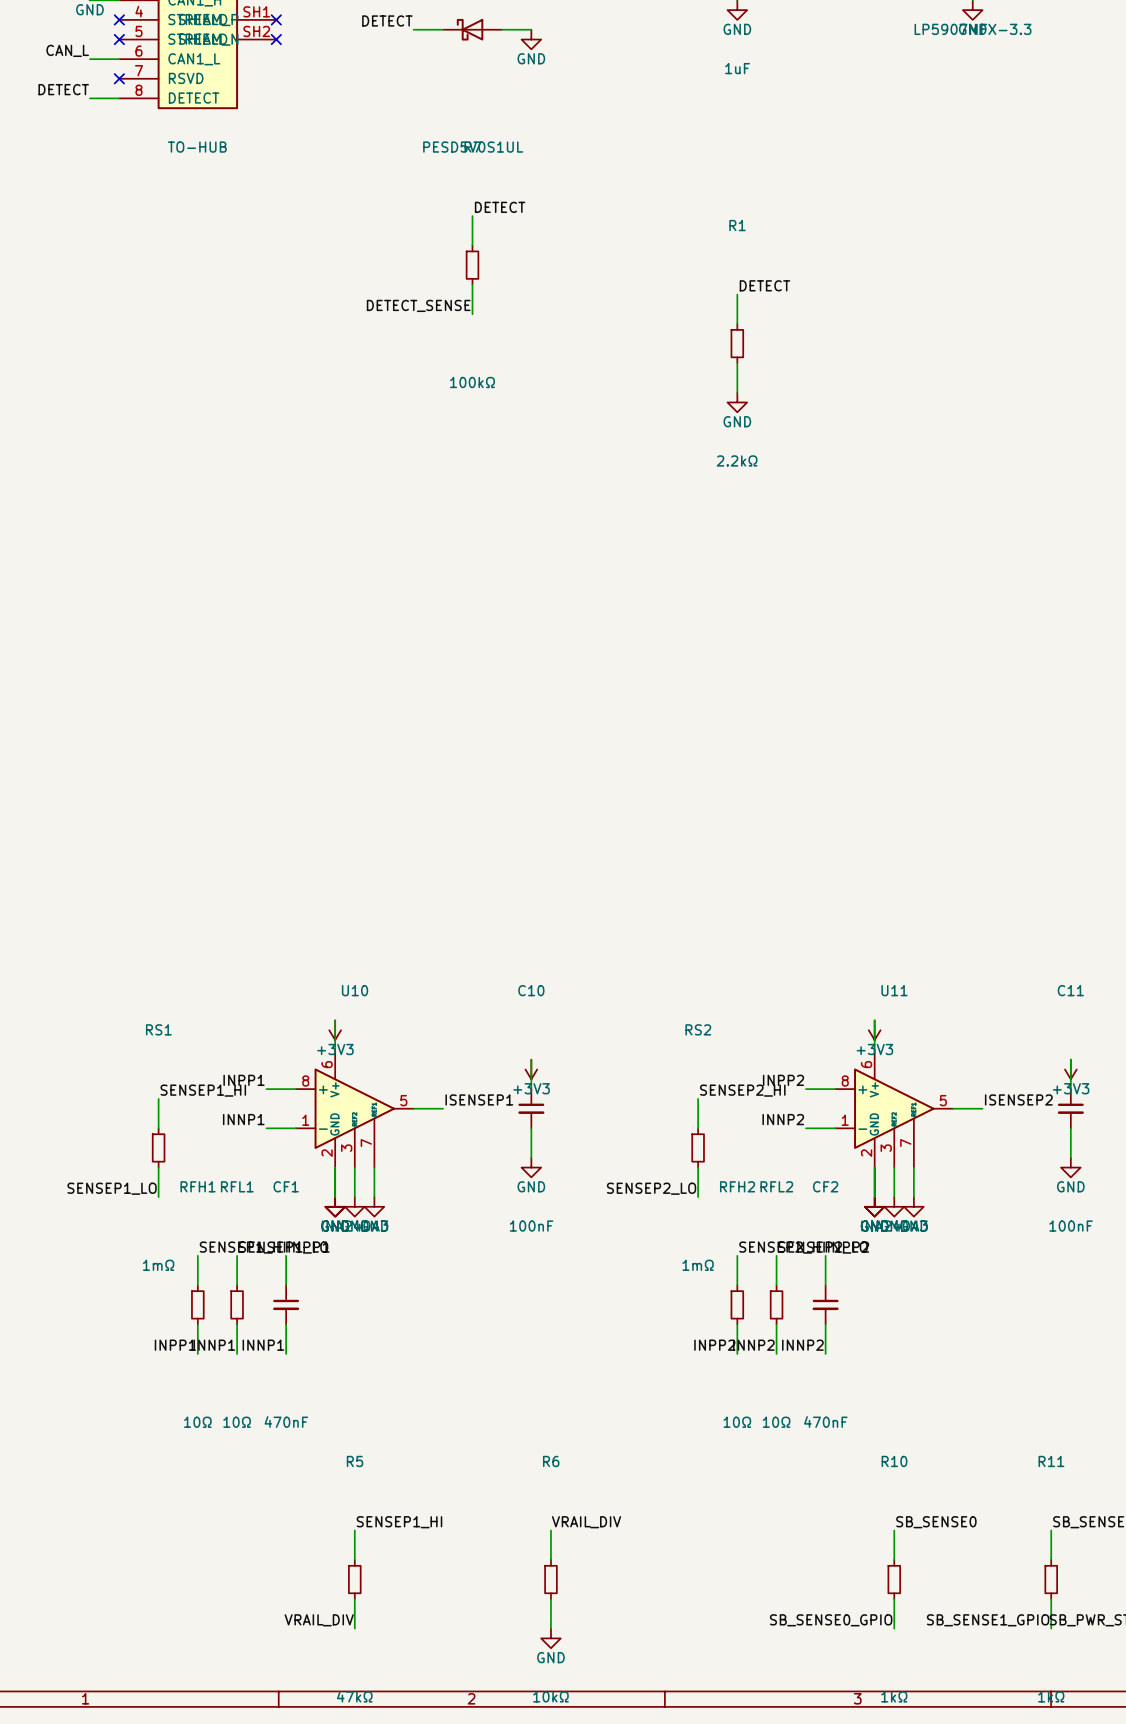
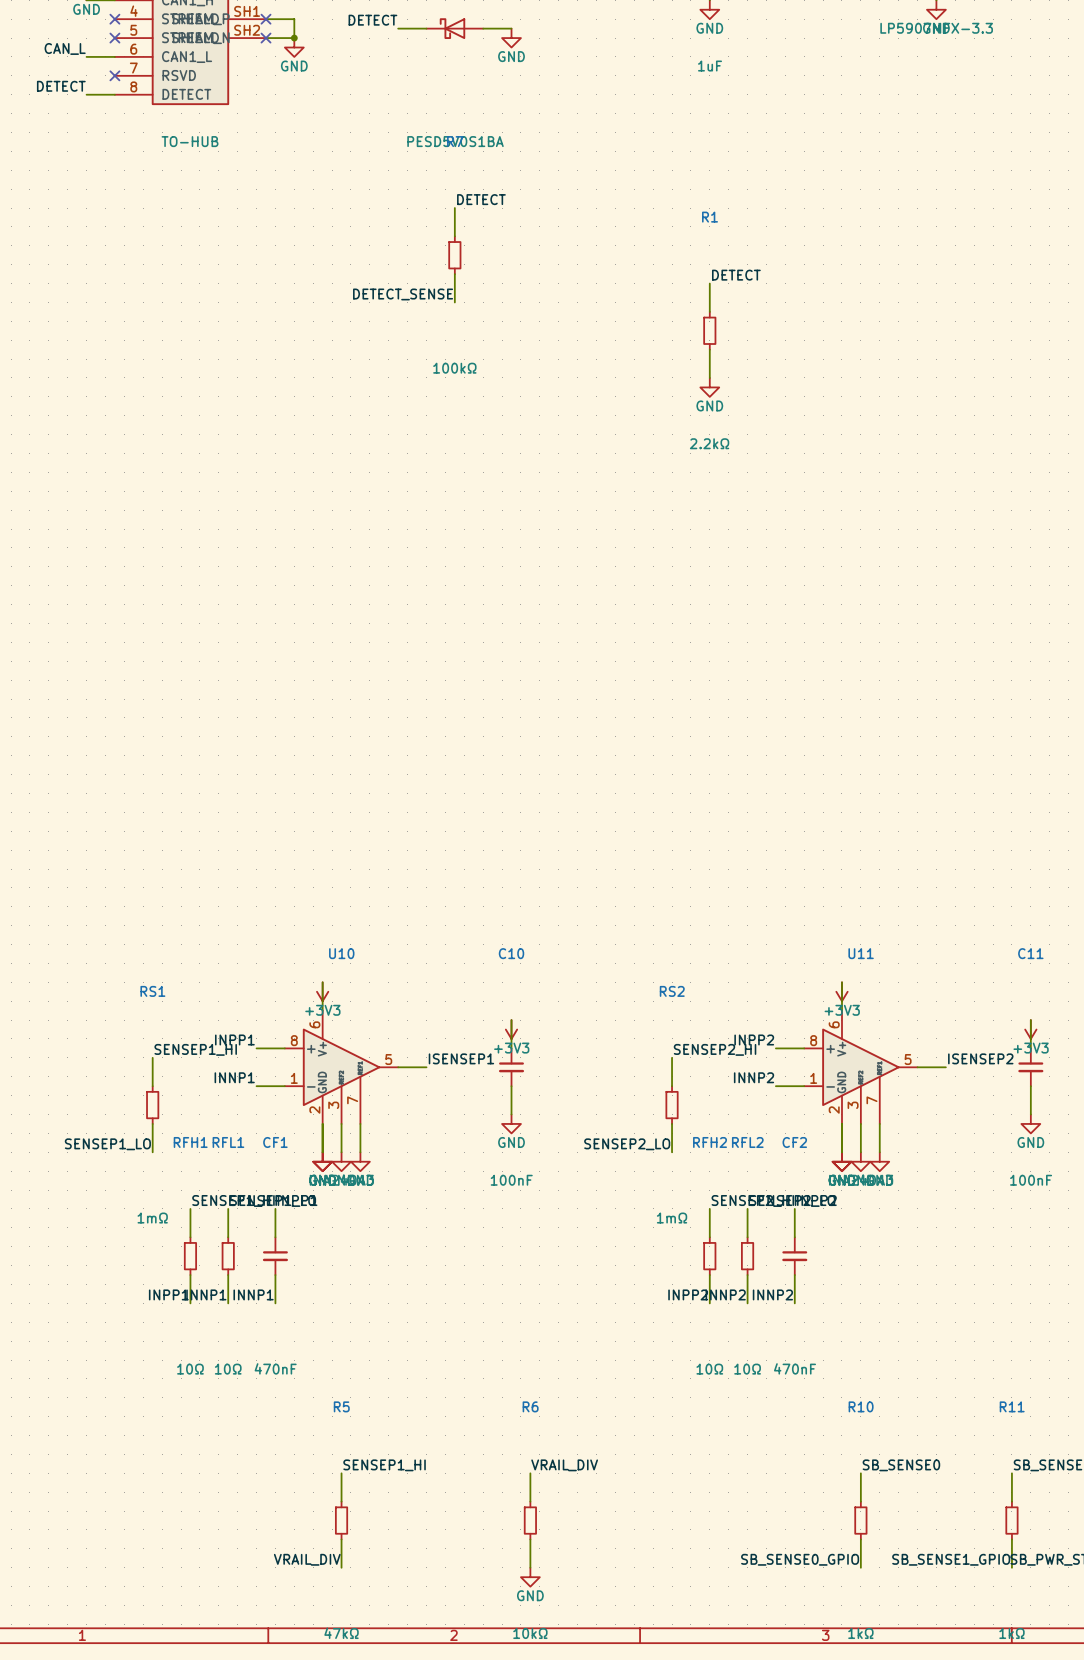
wire: none -> (265, 19) (294, 19) (294, 38) (265, 38)
junction: none -> (294, 38)
power symbol: none -> GND (294, 47)
part value: PESD5V0S1UL (473, 147) -> PESD5V0S1BA (455, 141)

